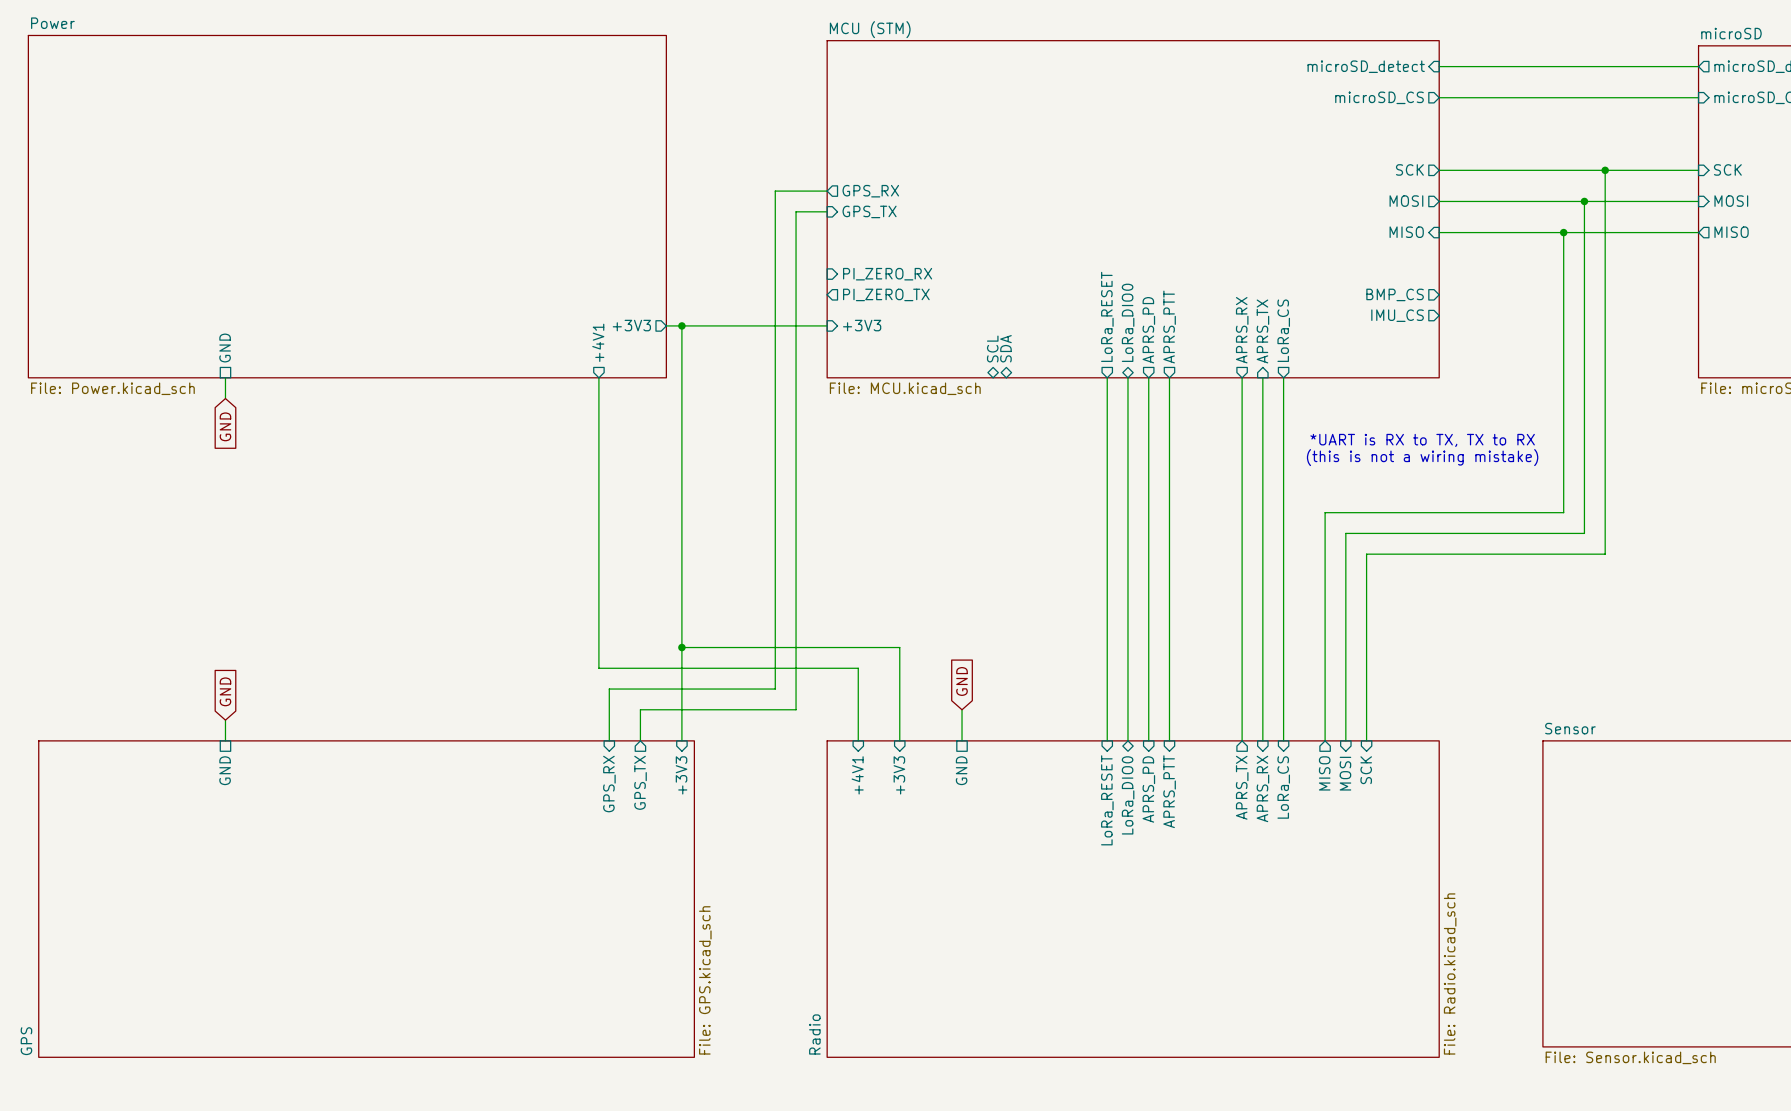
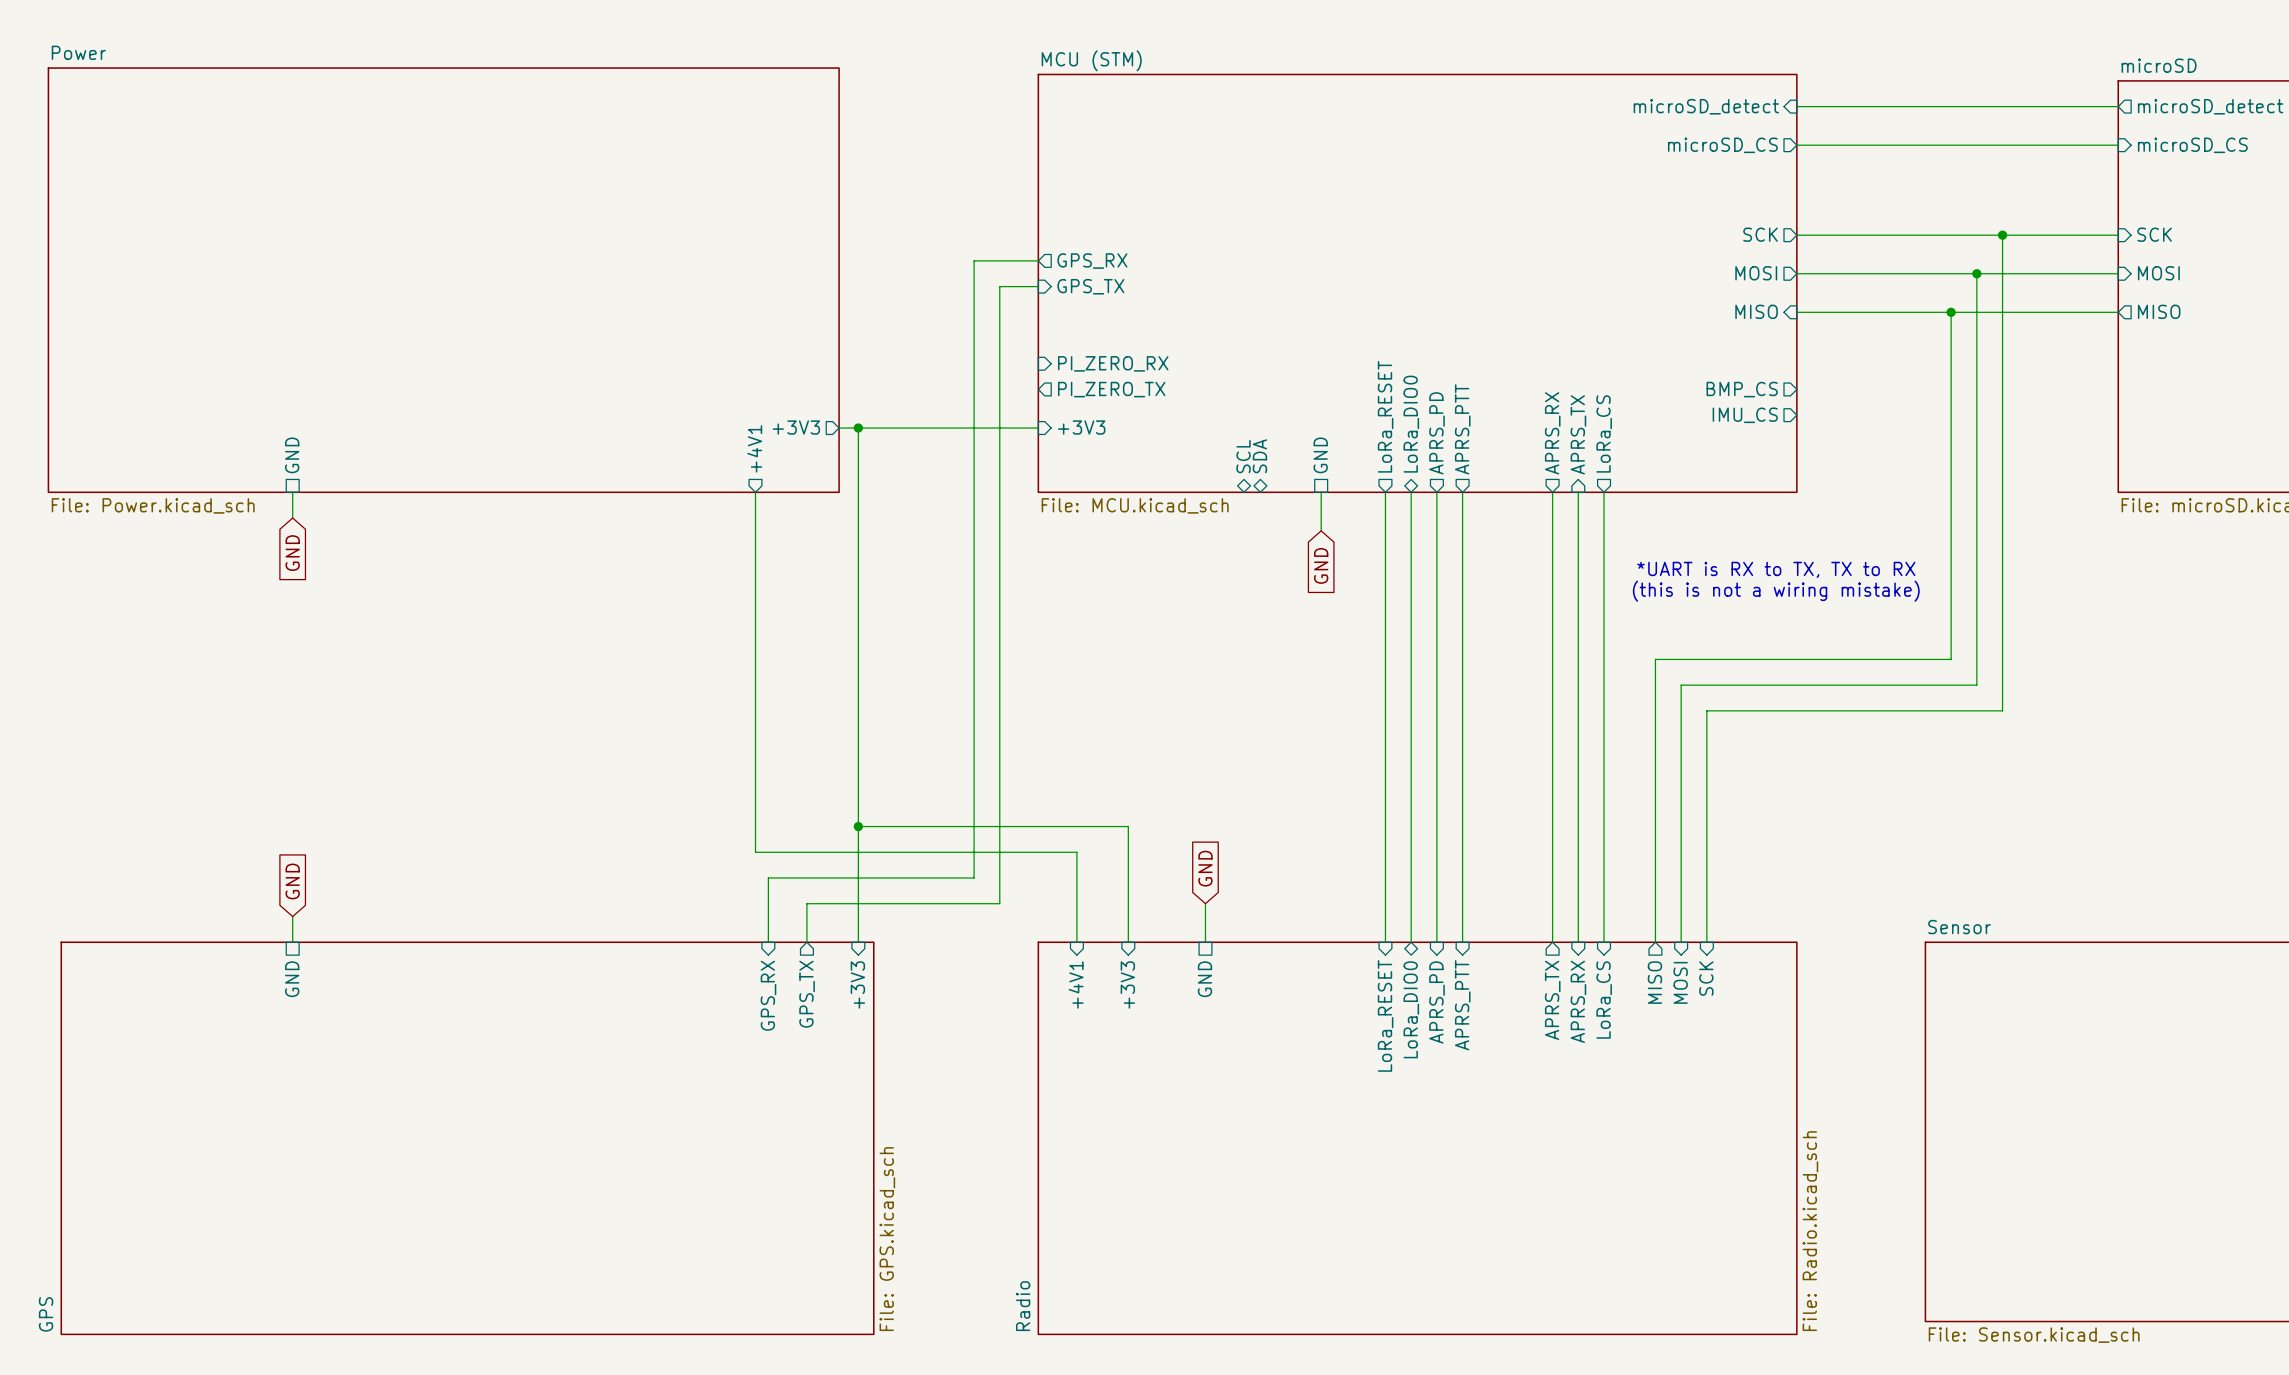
sheet pin: none -> GND (1320, 455)
wire: none -> (1321, 492) (1321, 530)
global label: none -> GND (1321, 565)

